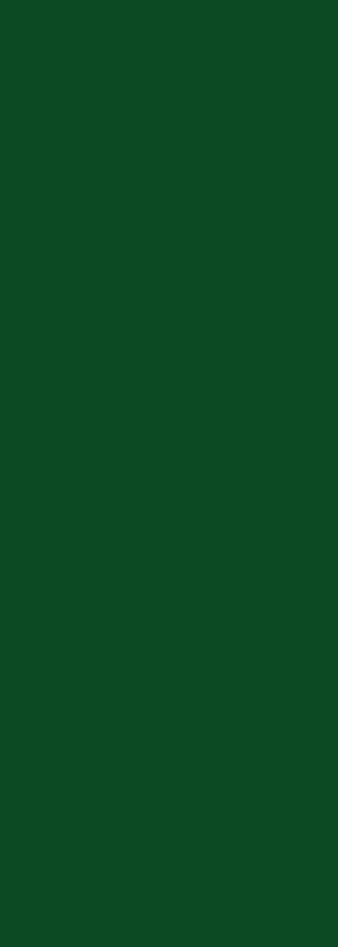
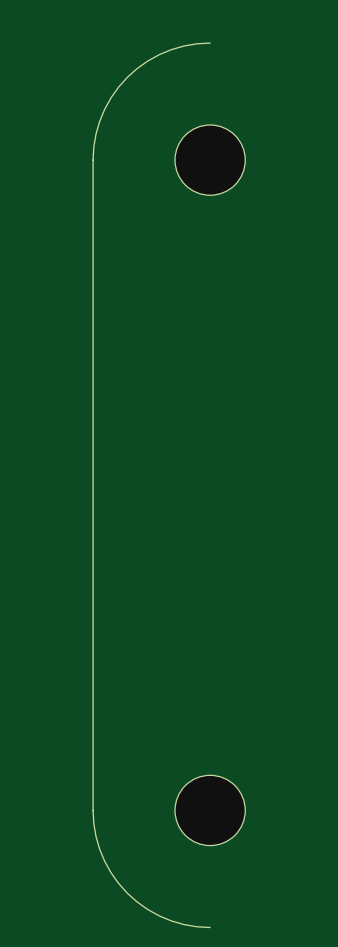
board edge: none -> (210, 43) (171, 49) (147, 61) (127, 77) (111, 97) (99, 121) (93, 160) (93, 823) (104, 861) (127, 893) (159, 915) (184, 924) (210, 927)
part: none -> (210, 160)
part: none -> (210, 810)

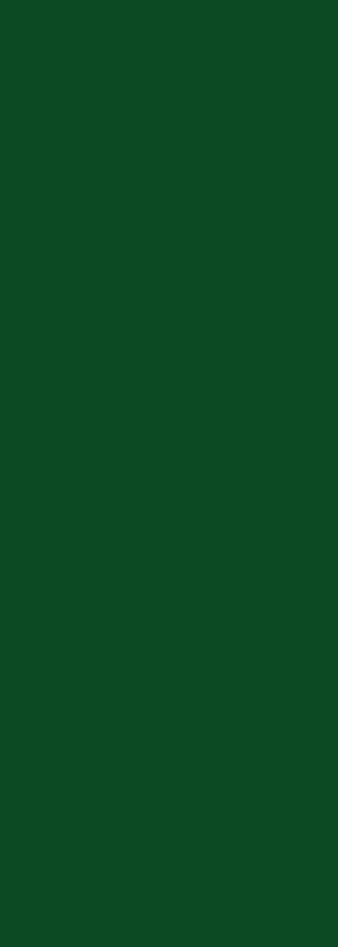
board edge: (210, 43) (171, 49) (147, 61) (127, 77) (111, 97) (99, 121) (93, 160) (93, 823) (104, 861) (127, 893) (159, 915) (184, 924) (210, 927) -> none
part: (210, 160) -> none
part: (210, 810) -> none

